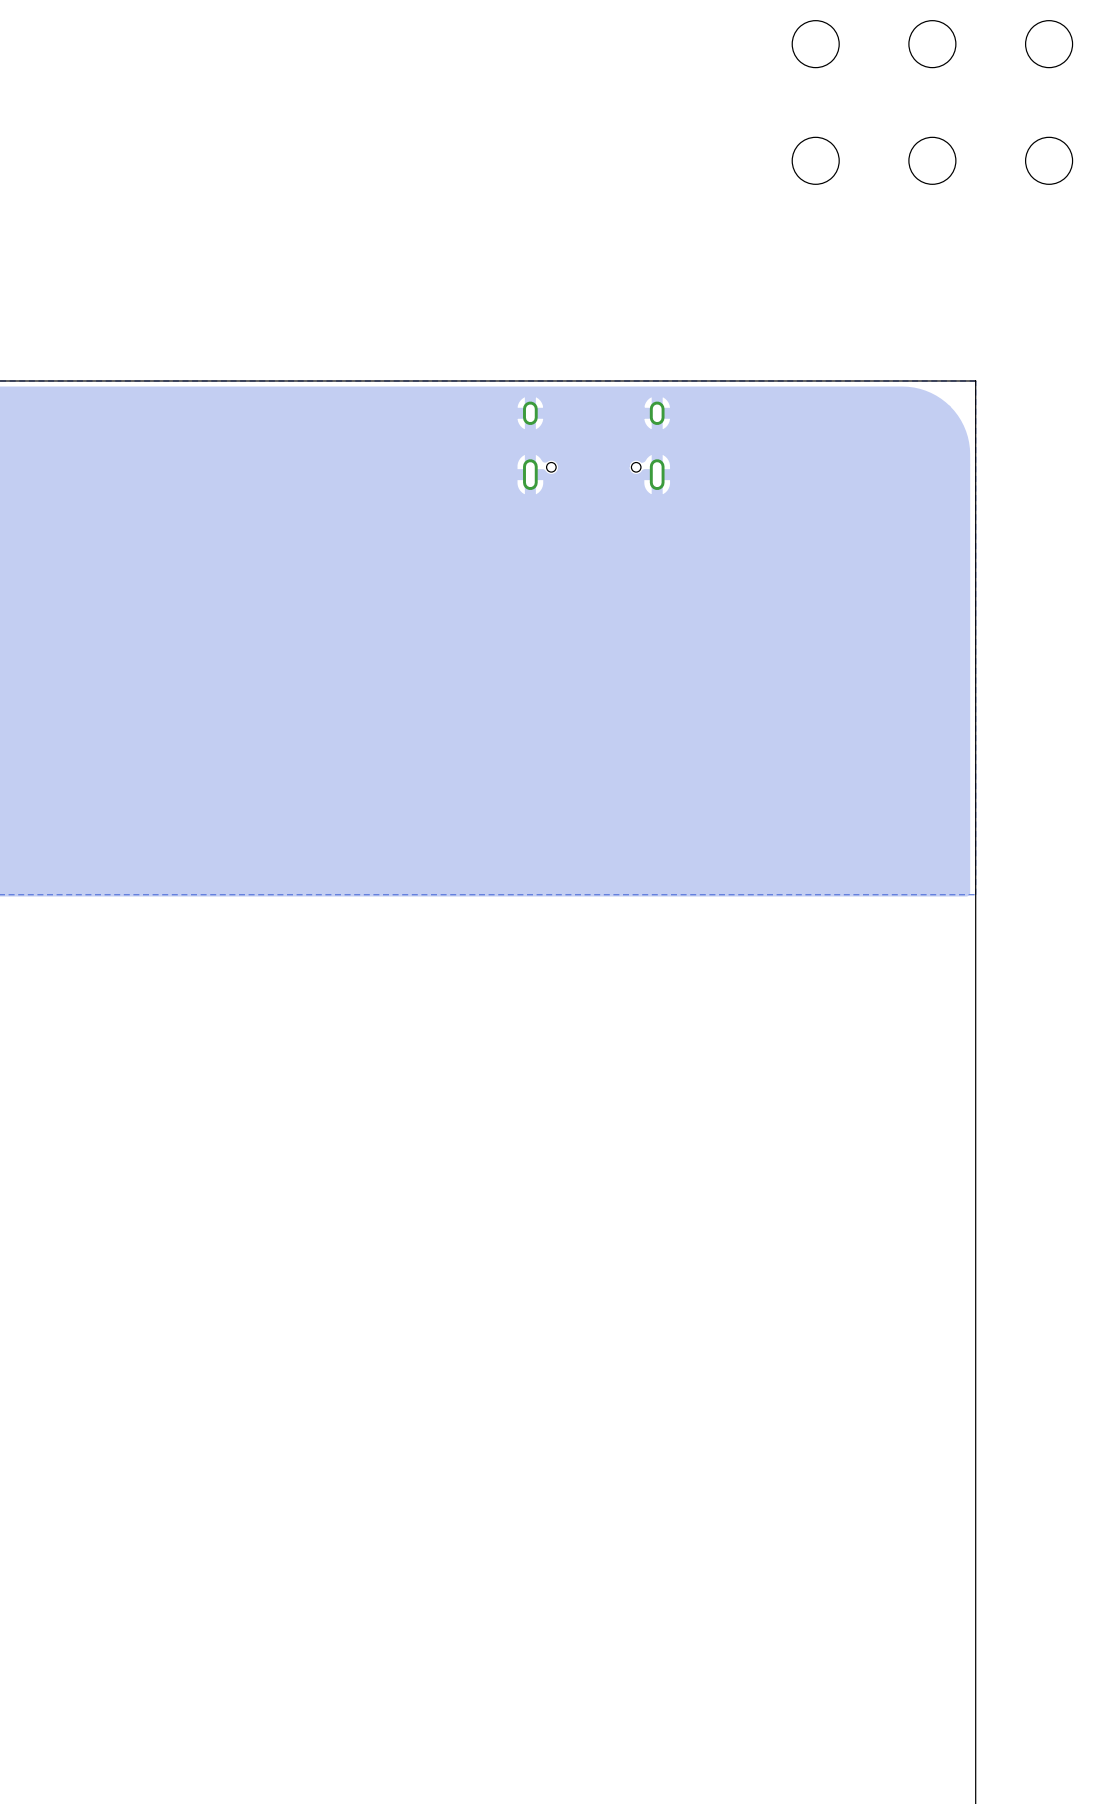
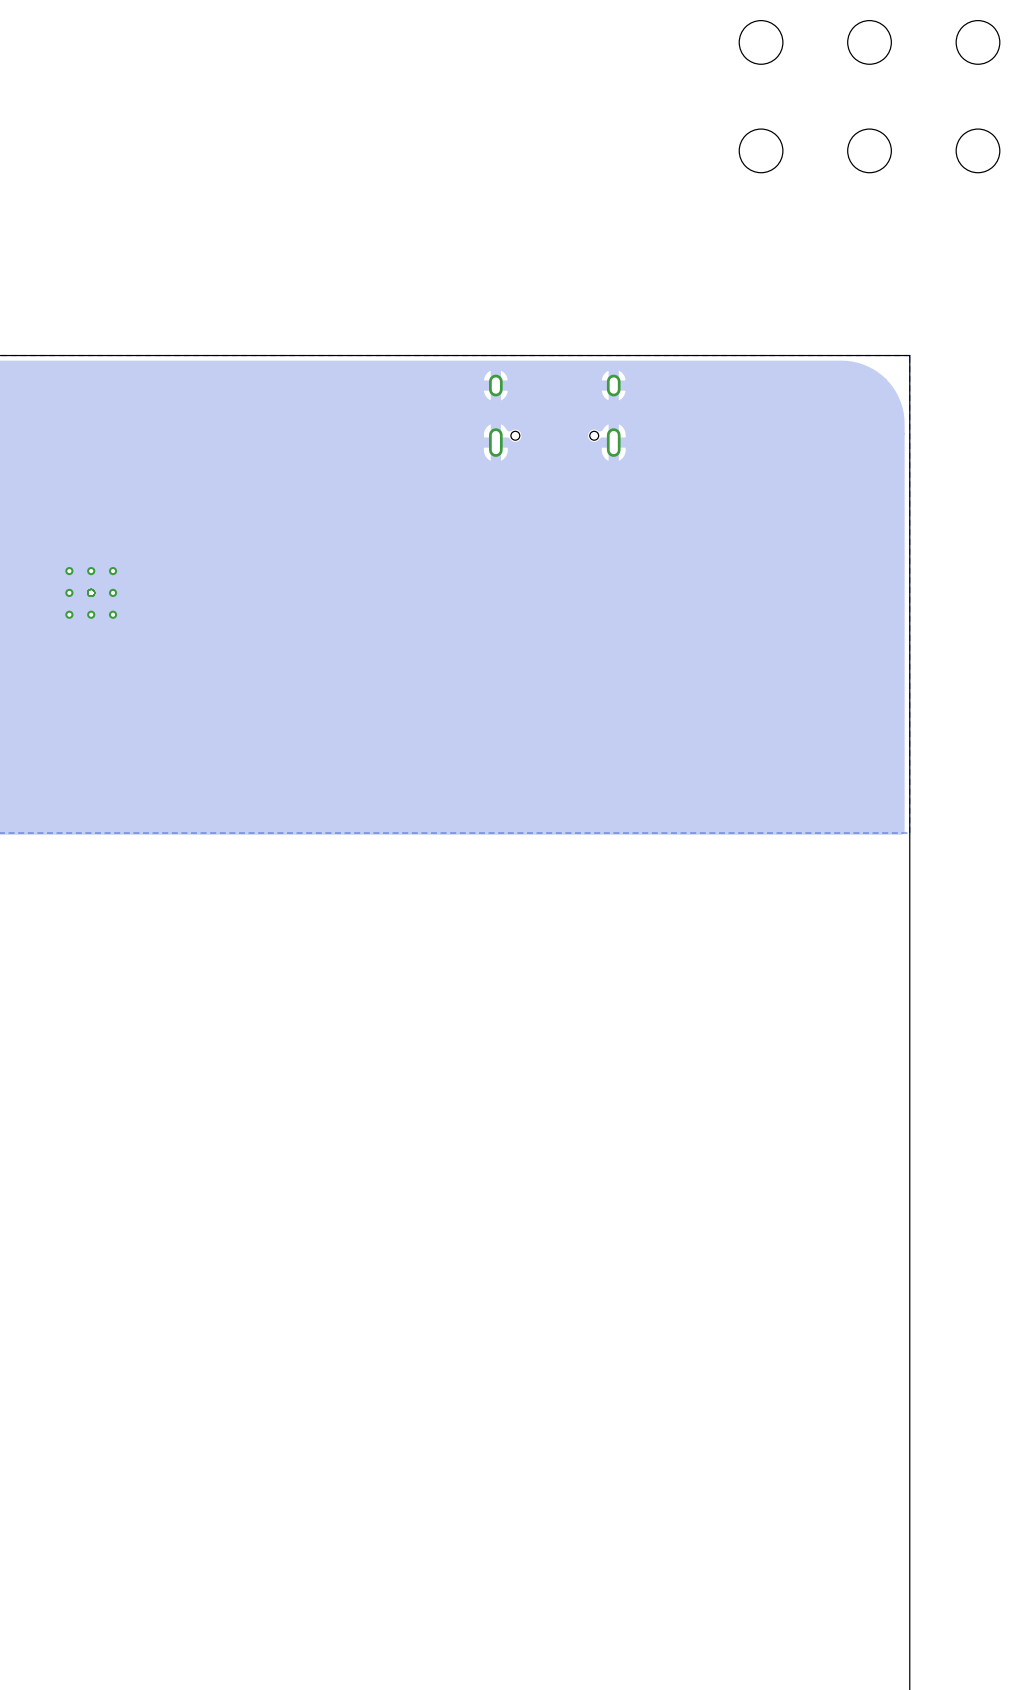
via: none -> (69, 571)
via: none -> (91, 571)
via: none -> (113, 571)
via: none -> (69, 592)
via: none -> (91, 592)
via: none -> (113, 592)
via: none -> (69, 614)
via: none -> (91, 614)
via: none -> (113, 614)

